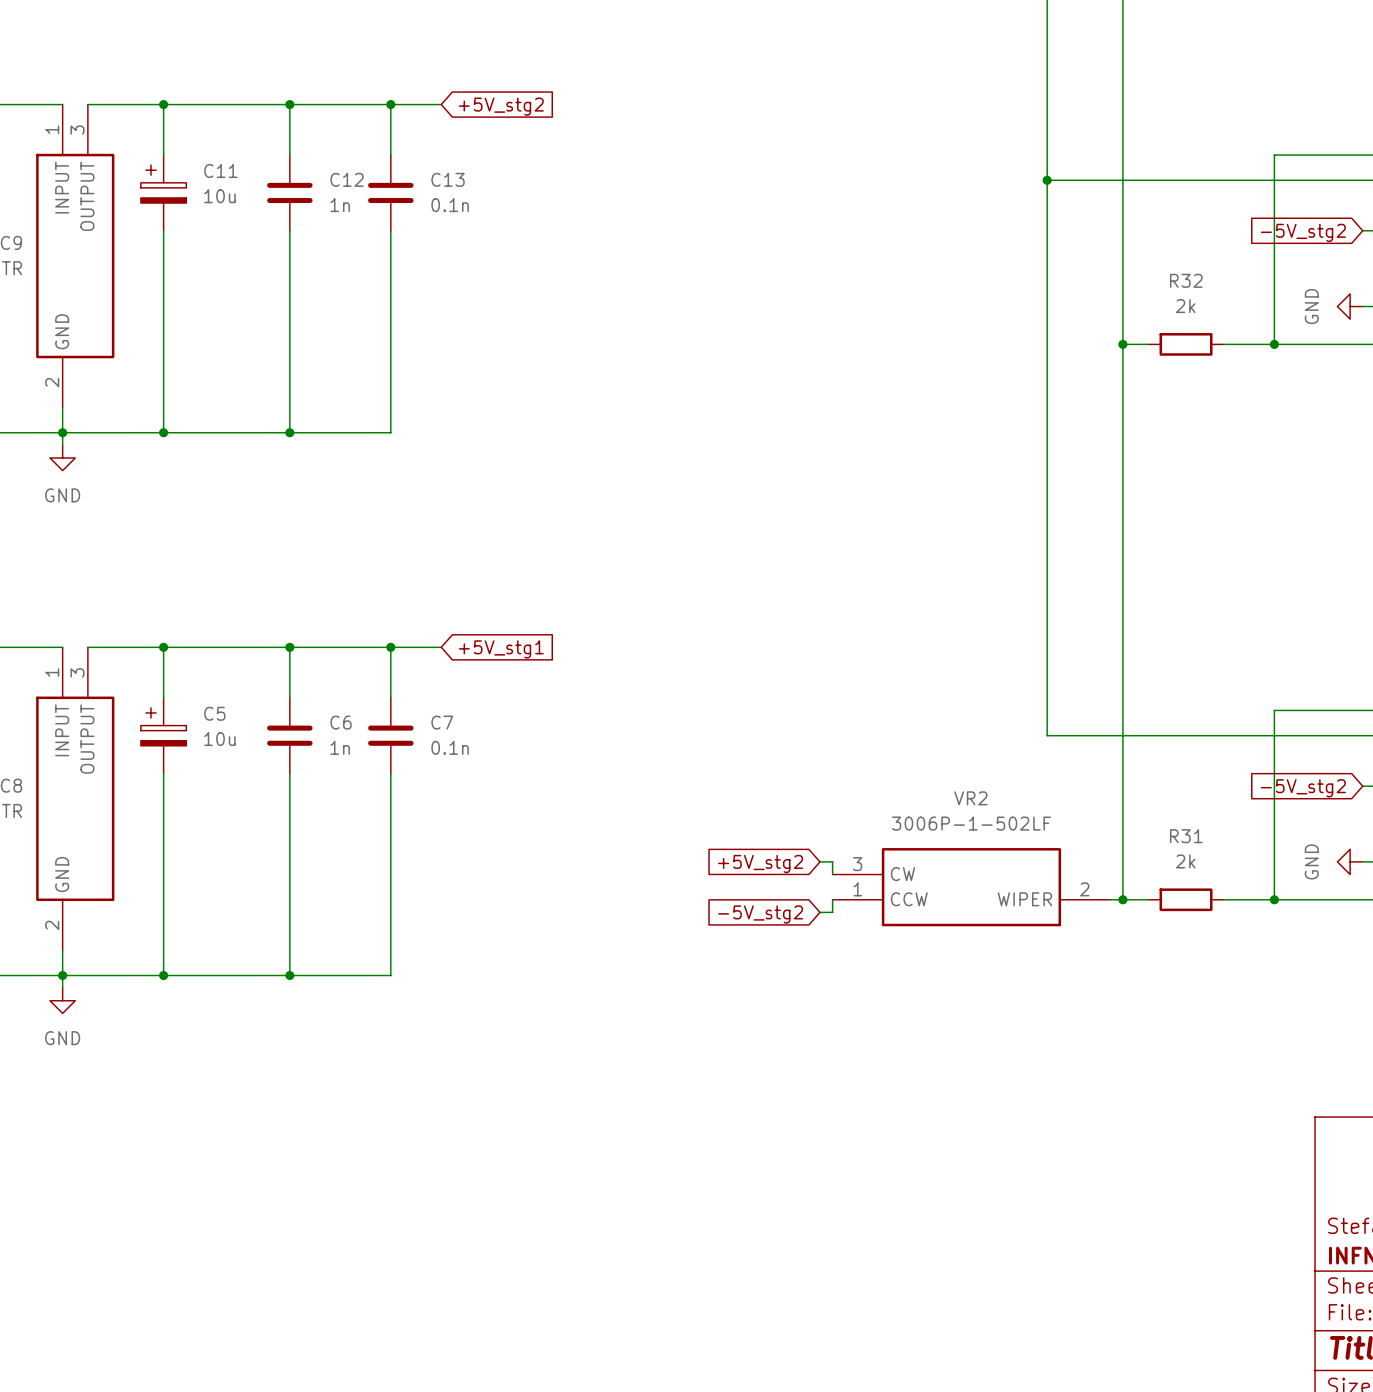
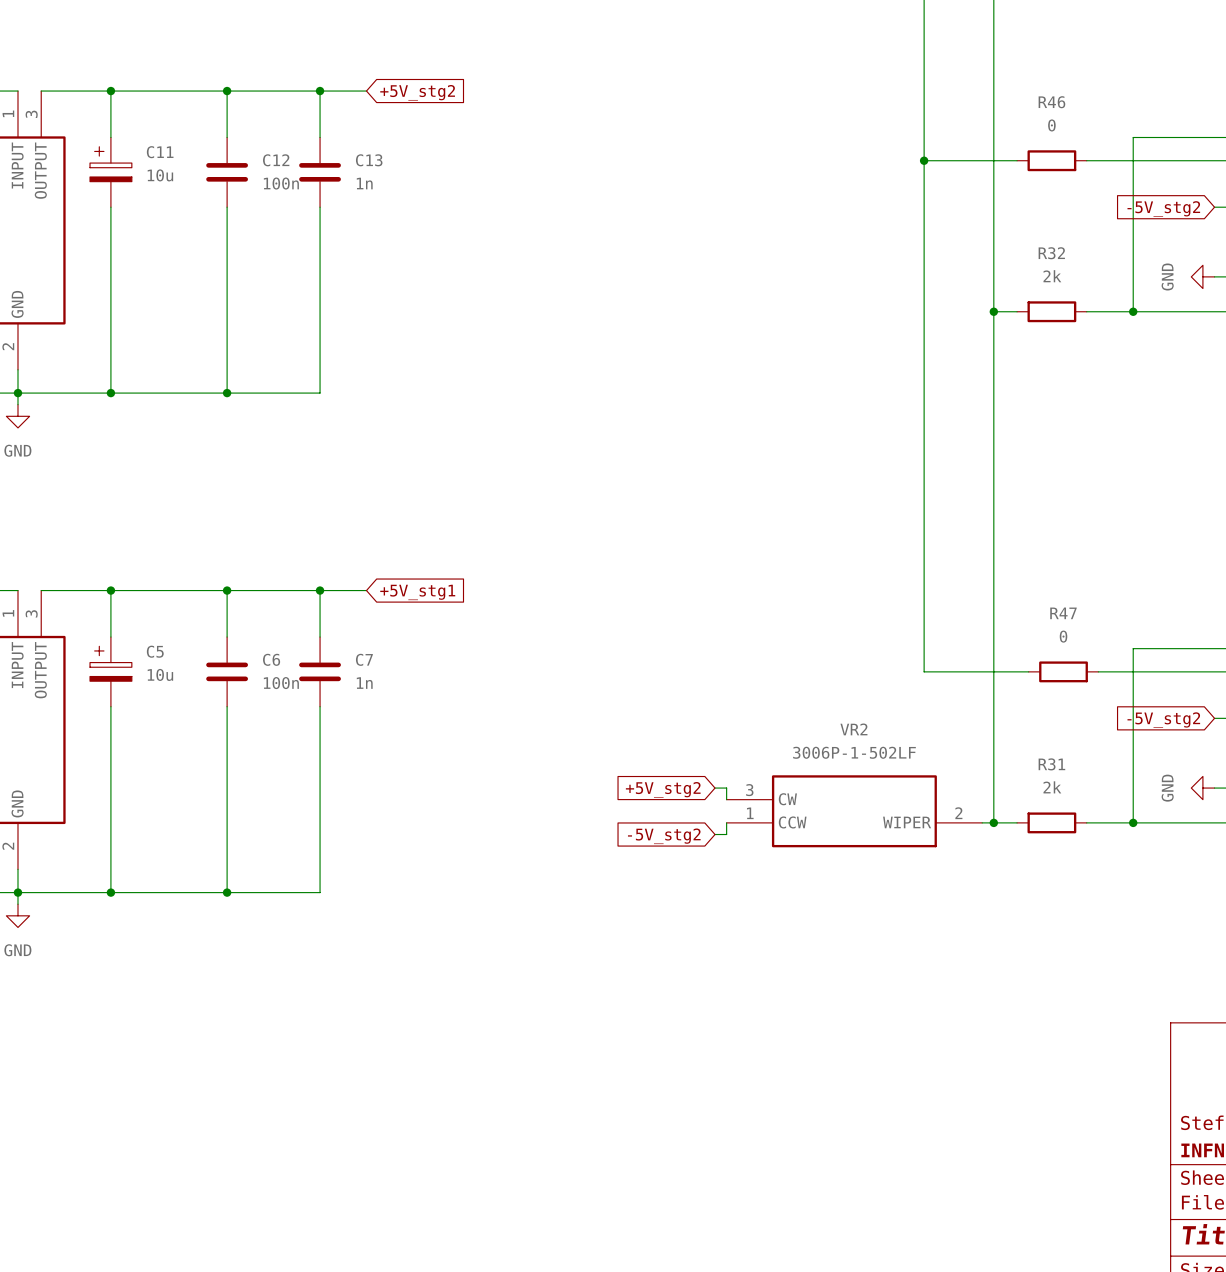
wire: (1148, 180) (1223, 180) -> none
R46: none -> 0 (1051, 160)
C12 value: 1n (340, 205) -> 100n (281, 183)
C13 value: 0.1n (450, 205) -> 1n (364, 183)
wire: (1160, 735) (1236, 735) -> none
R47: none -> 0 (1063, 671)
C6 value: 1n (340, 747) -> 100n (281, 683)
C7 value: 0.1n (450, 747) -> 1n (364, 683)

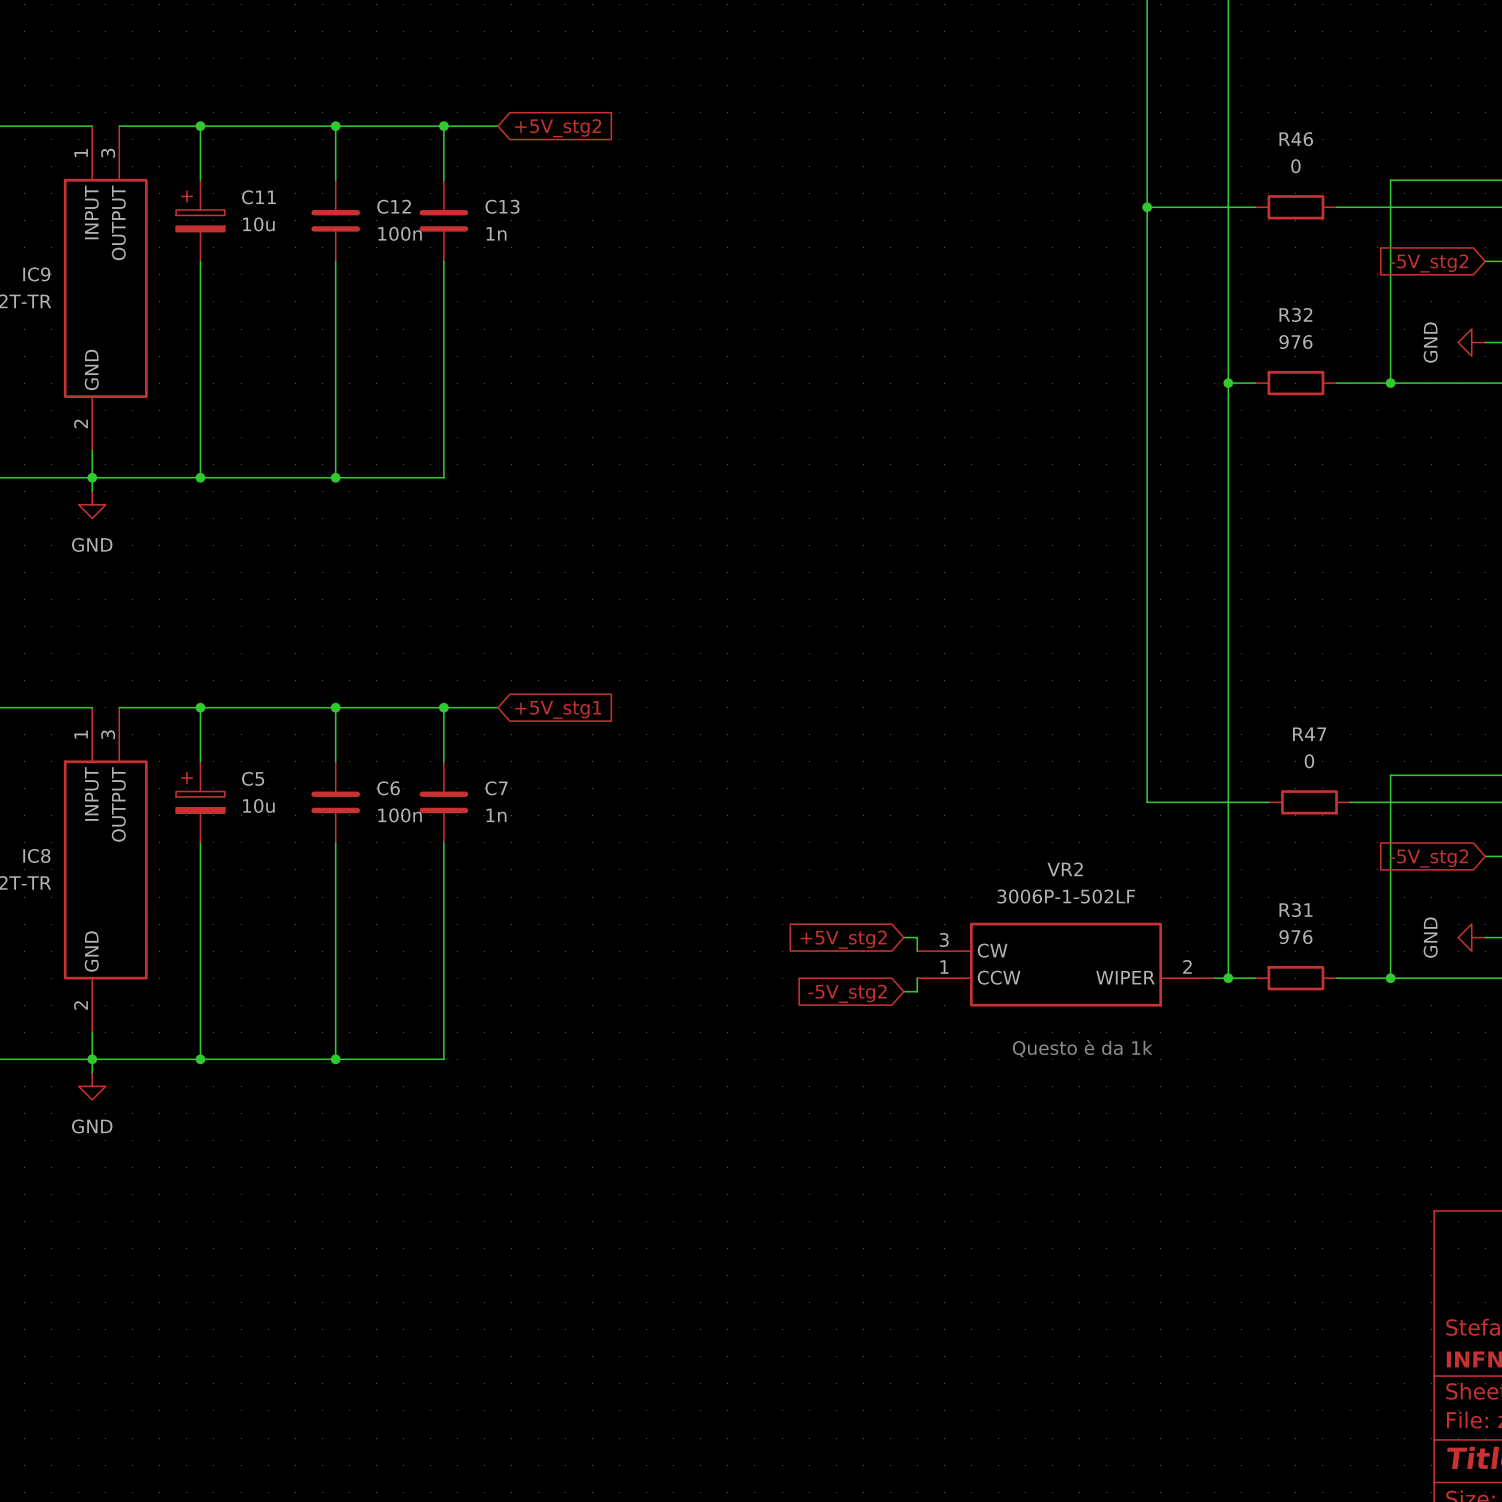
R32 value: 2k (1052, 276) -> 976 (1295, 342)
R31 value: 2k (1052, 787) -> 976 (1295, 937)
text: none -> Questo è da 1k (1082, 1048)

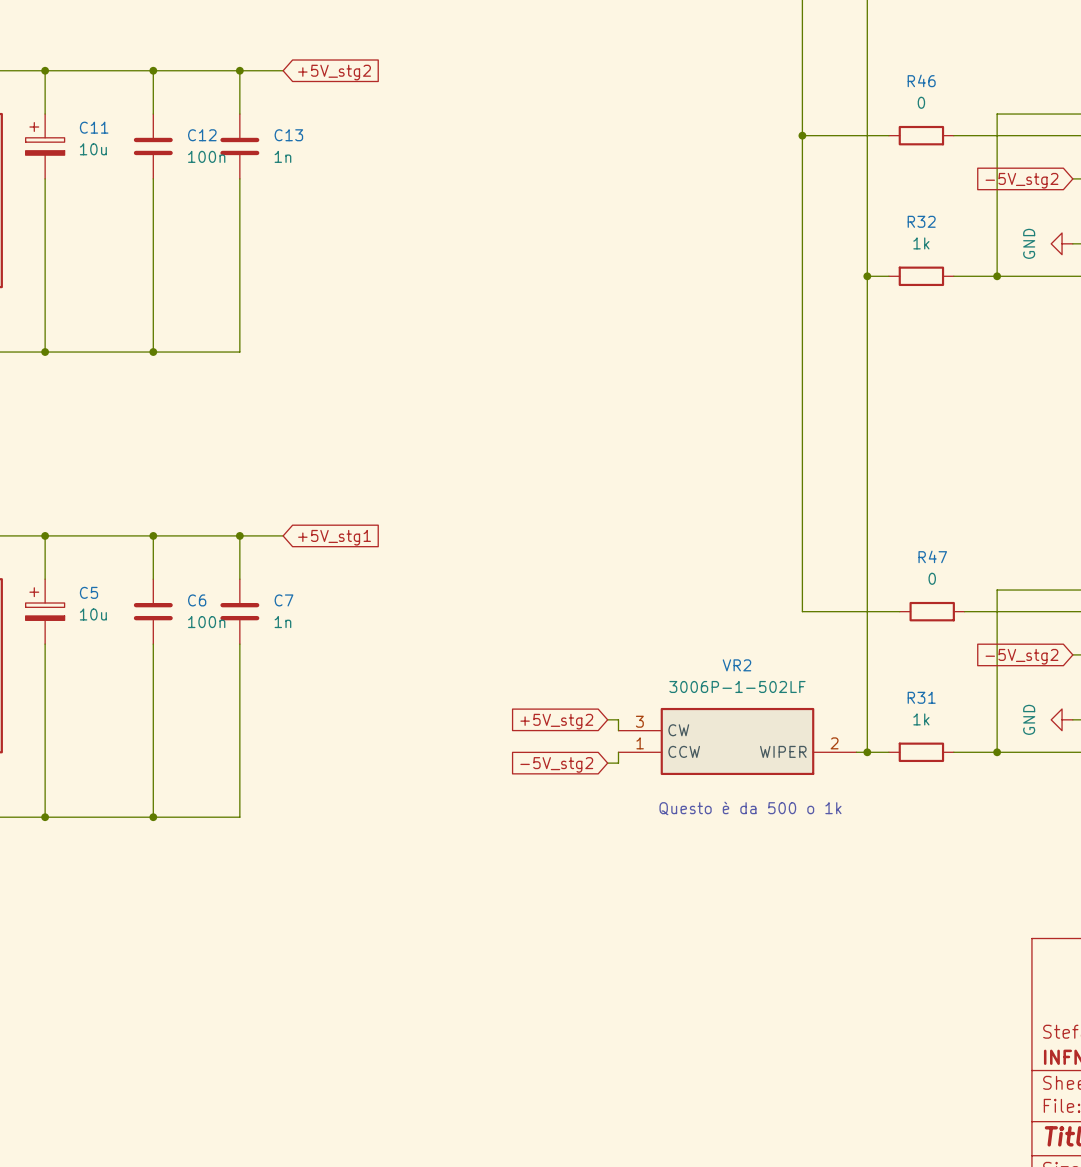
R32 value: 976 (1295, 342) -> 1k (921, 243)
R31 value: 976 (1295, 937) -> 1k (921, 719)
text: Questo è da 1k (1082, 1048) -> Questo è da 500 o 1k (750, 808)

